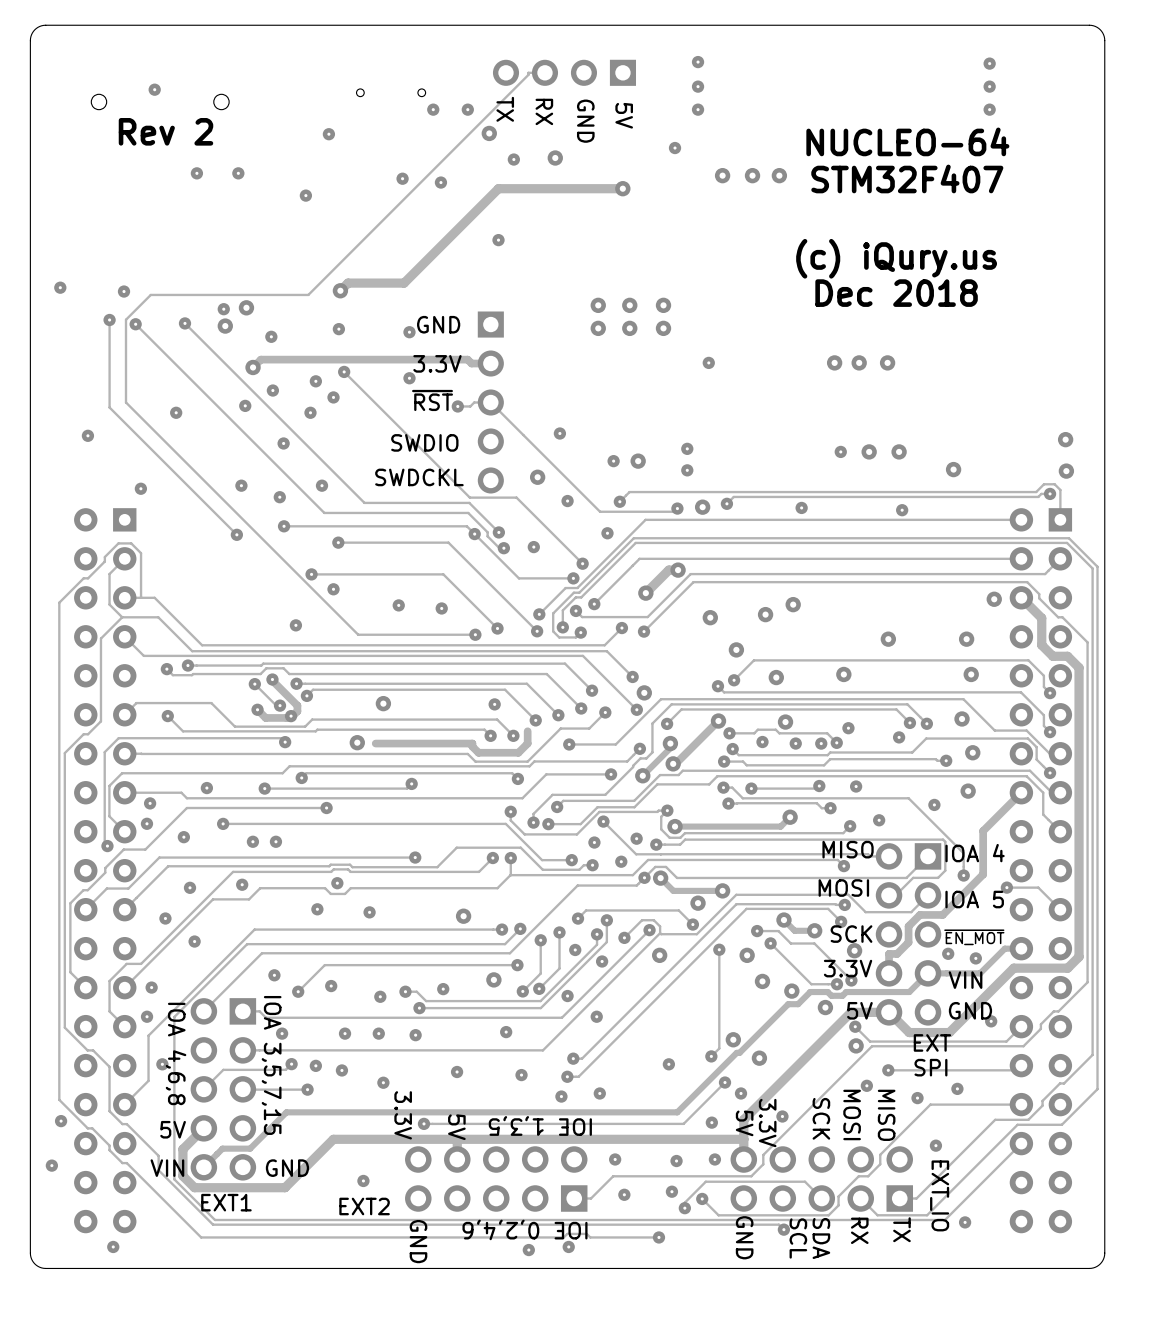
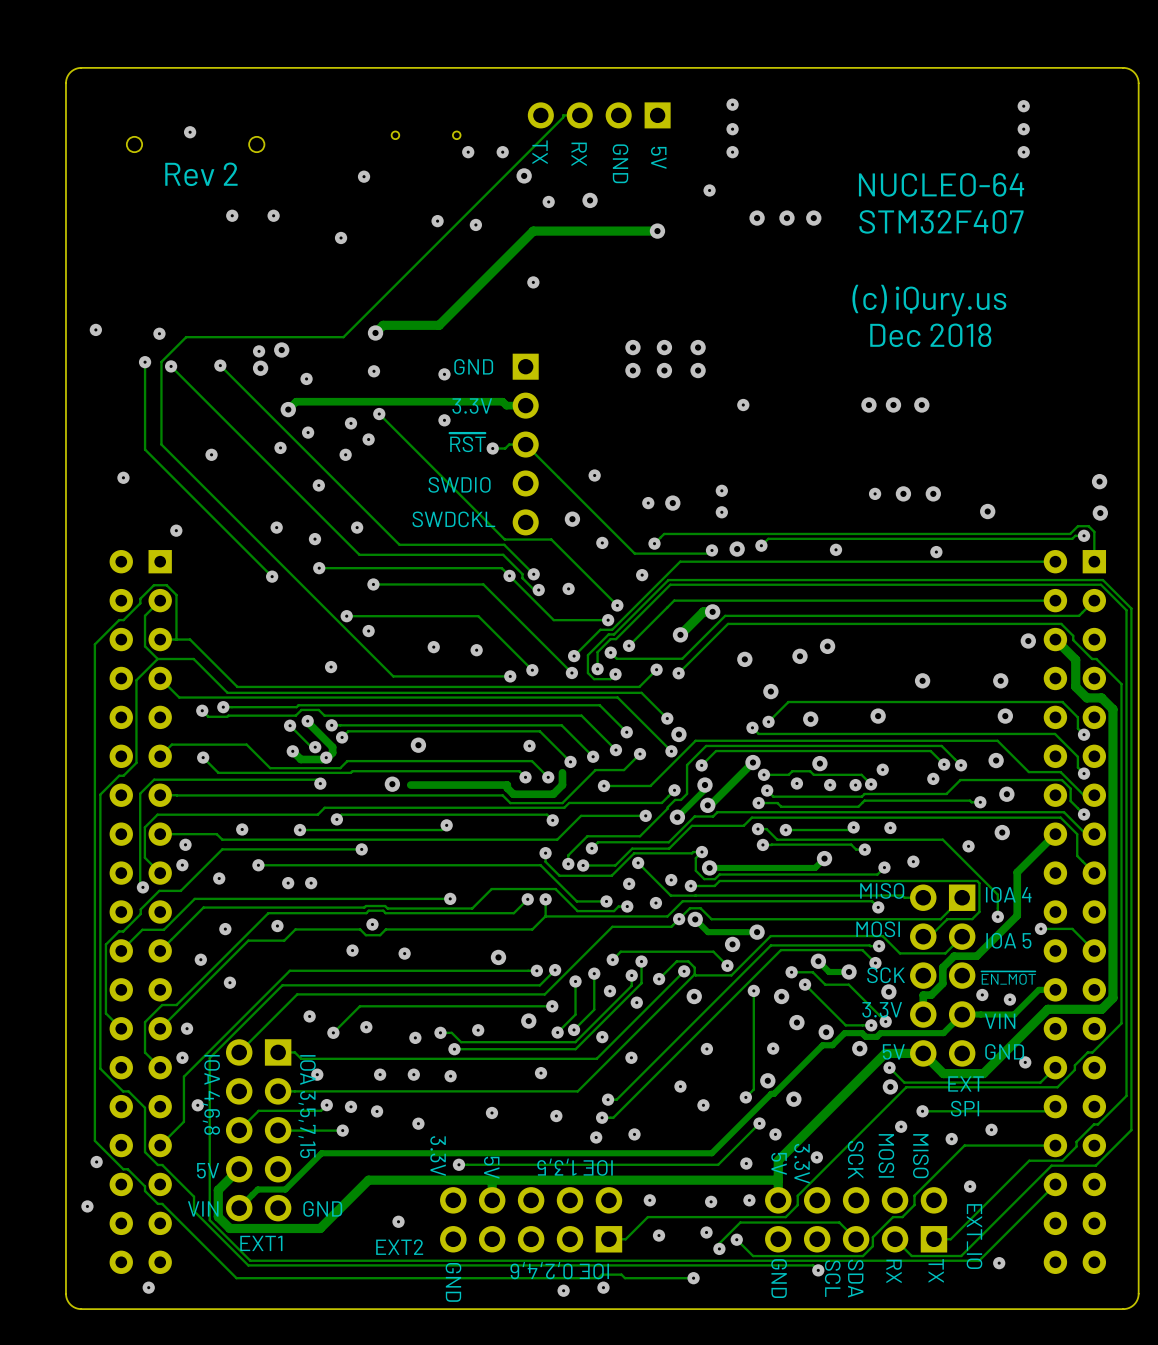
via: none -> (706, 1048)
via: none -> (773, 1048)
via: none -> (680, 1086)

